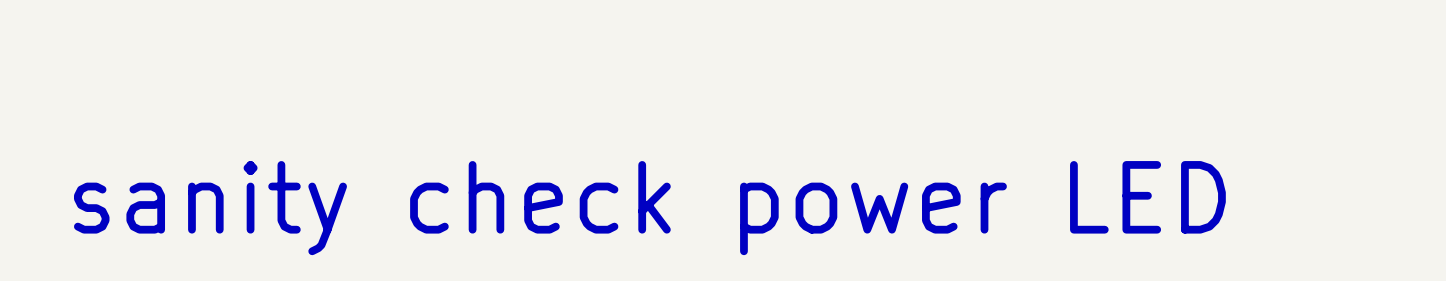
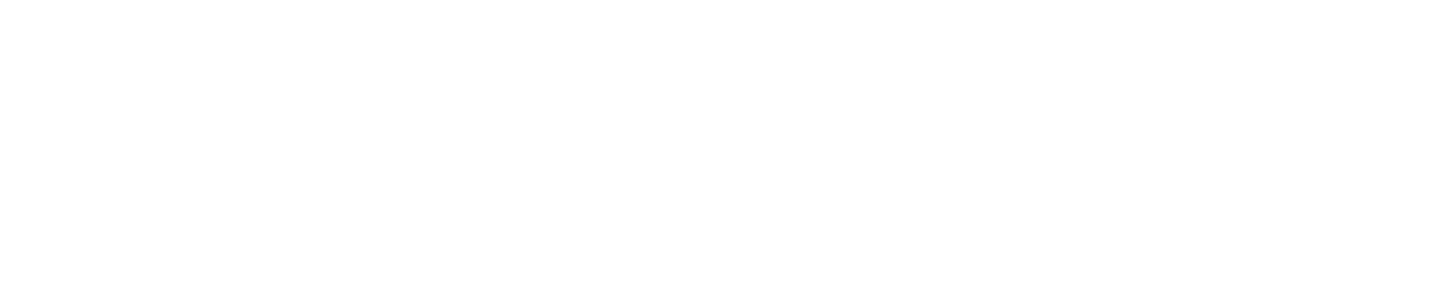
text: sanity check power LED (649, 208) -> none

